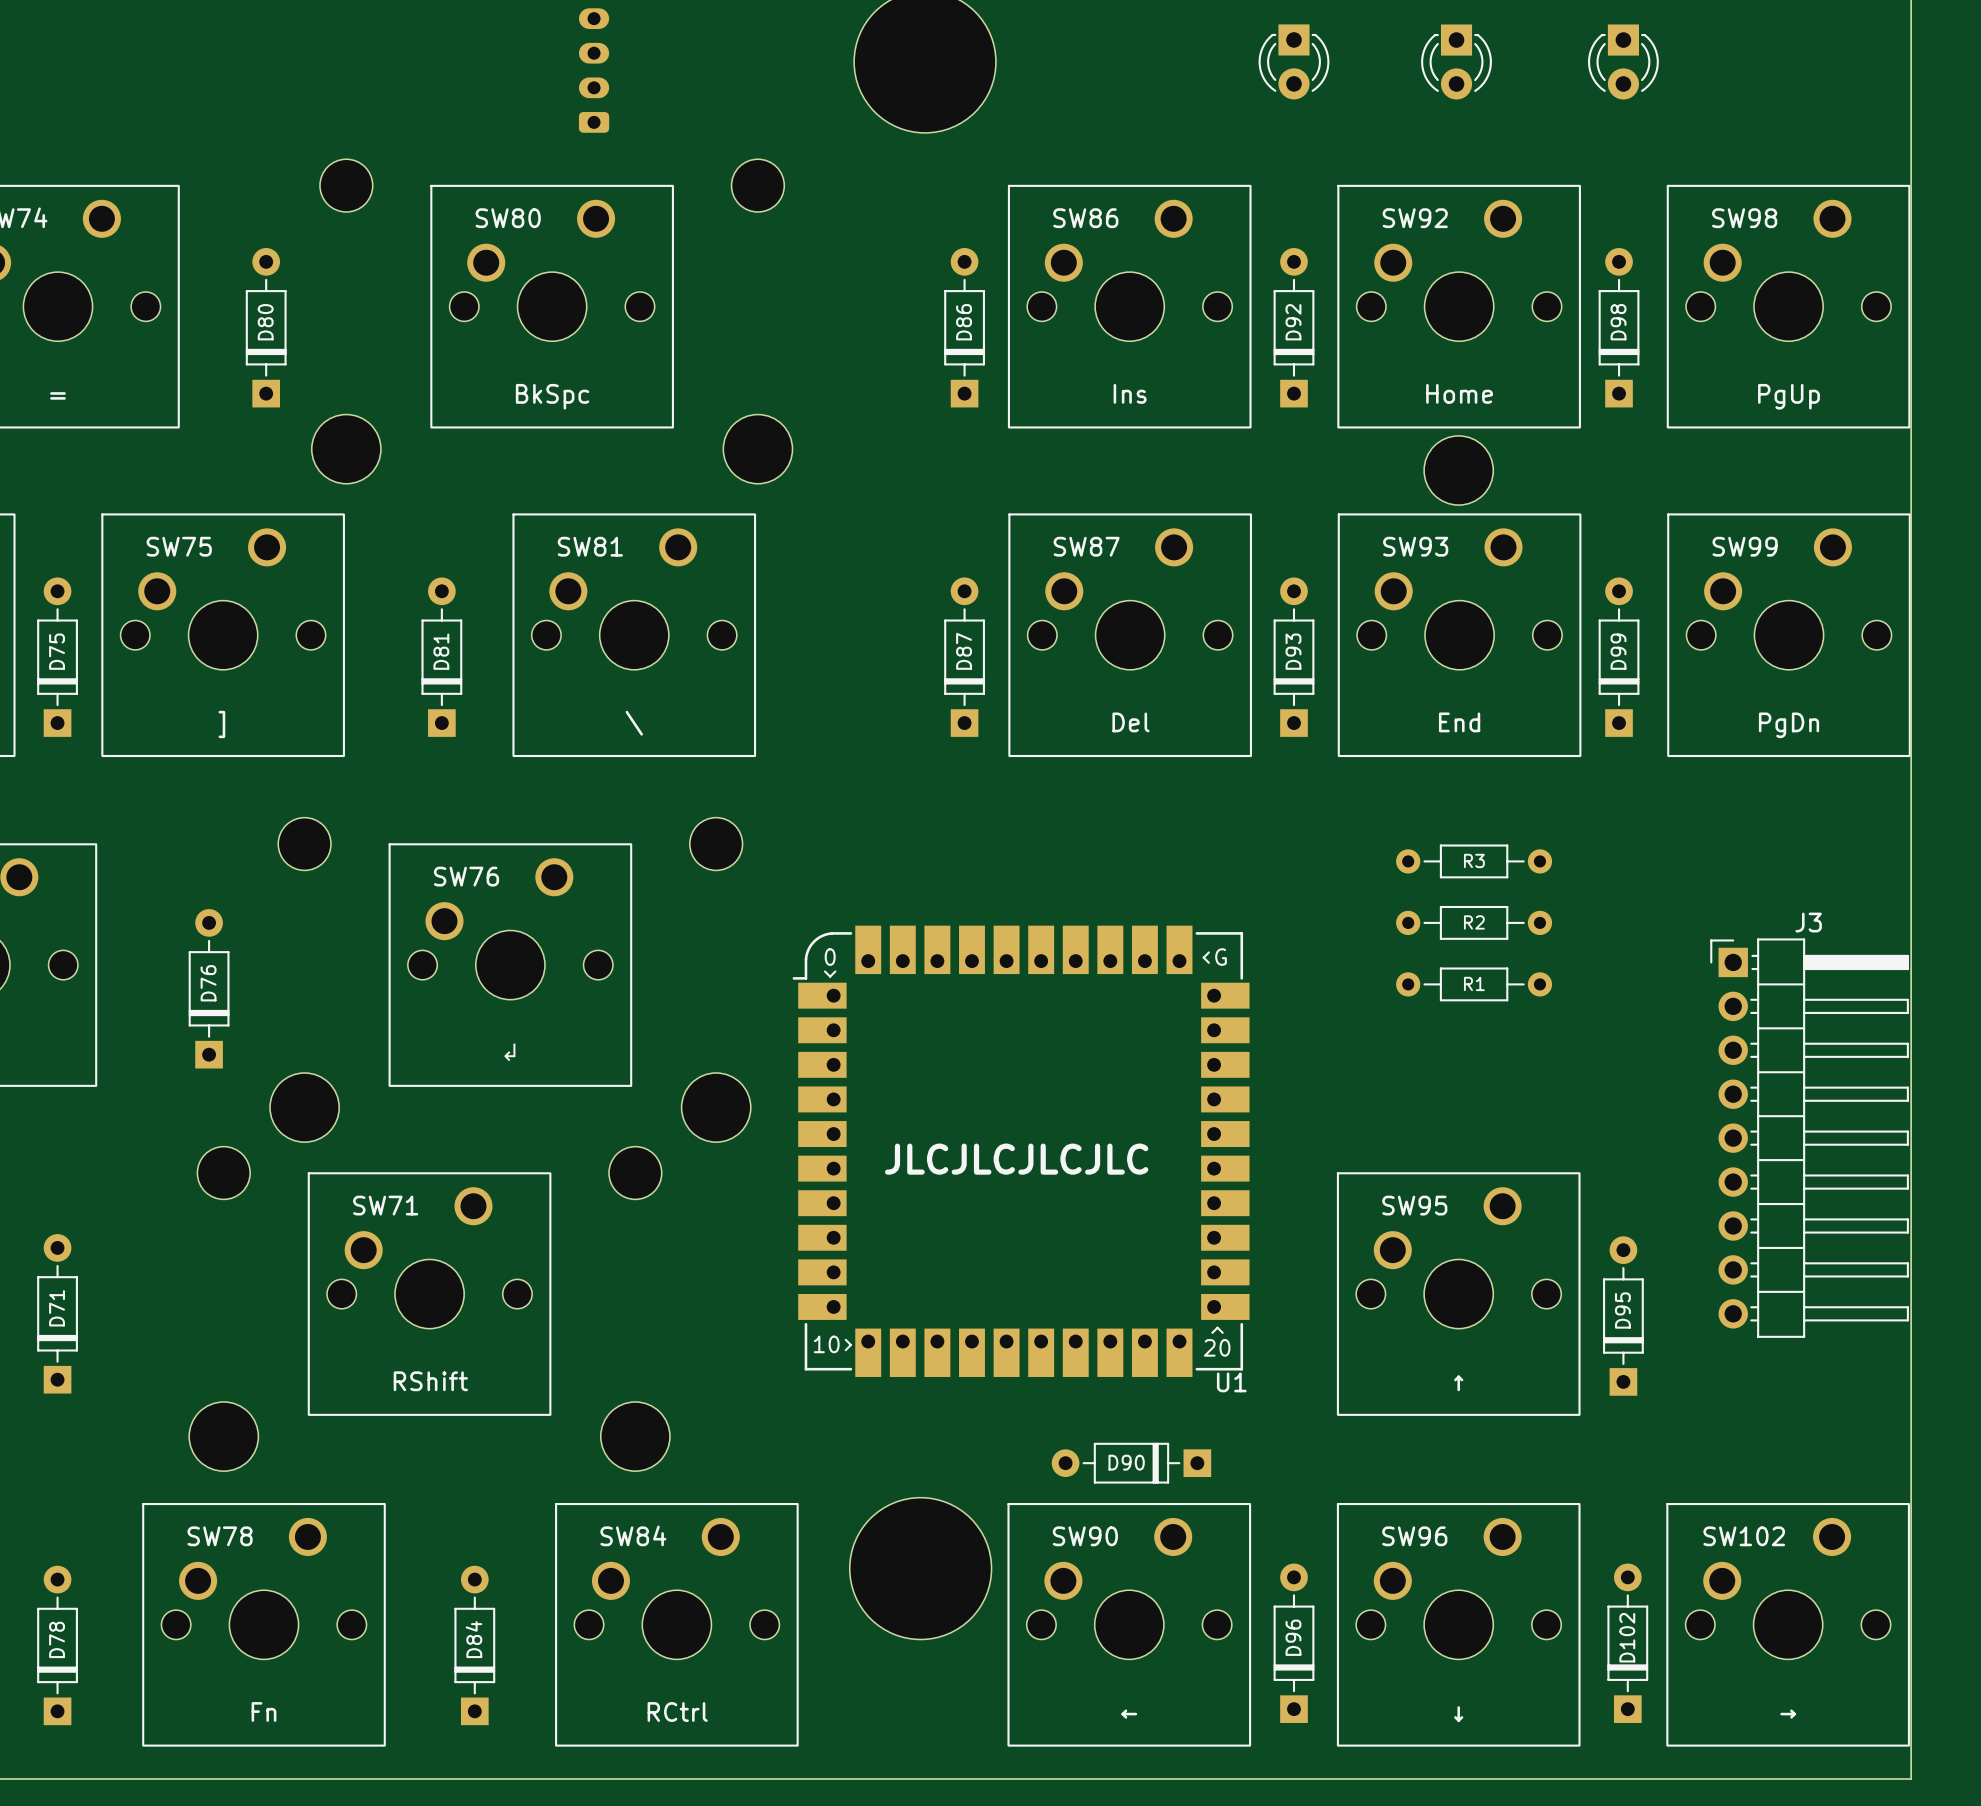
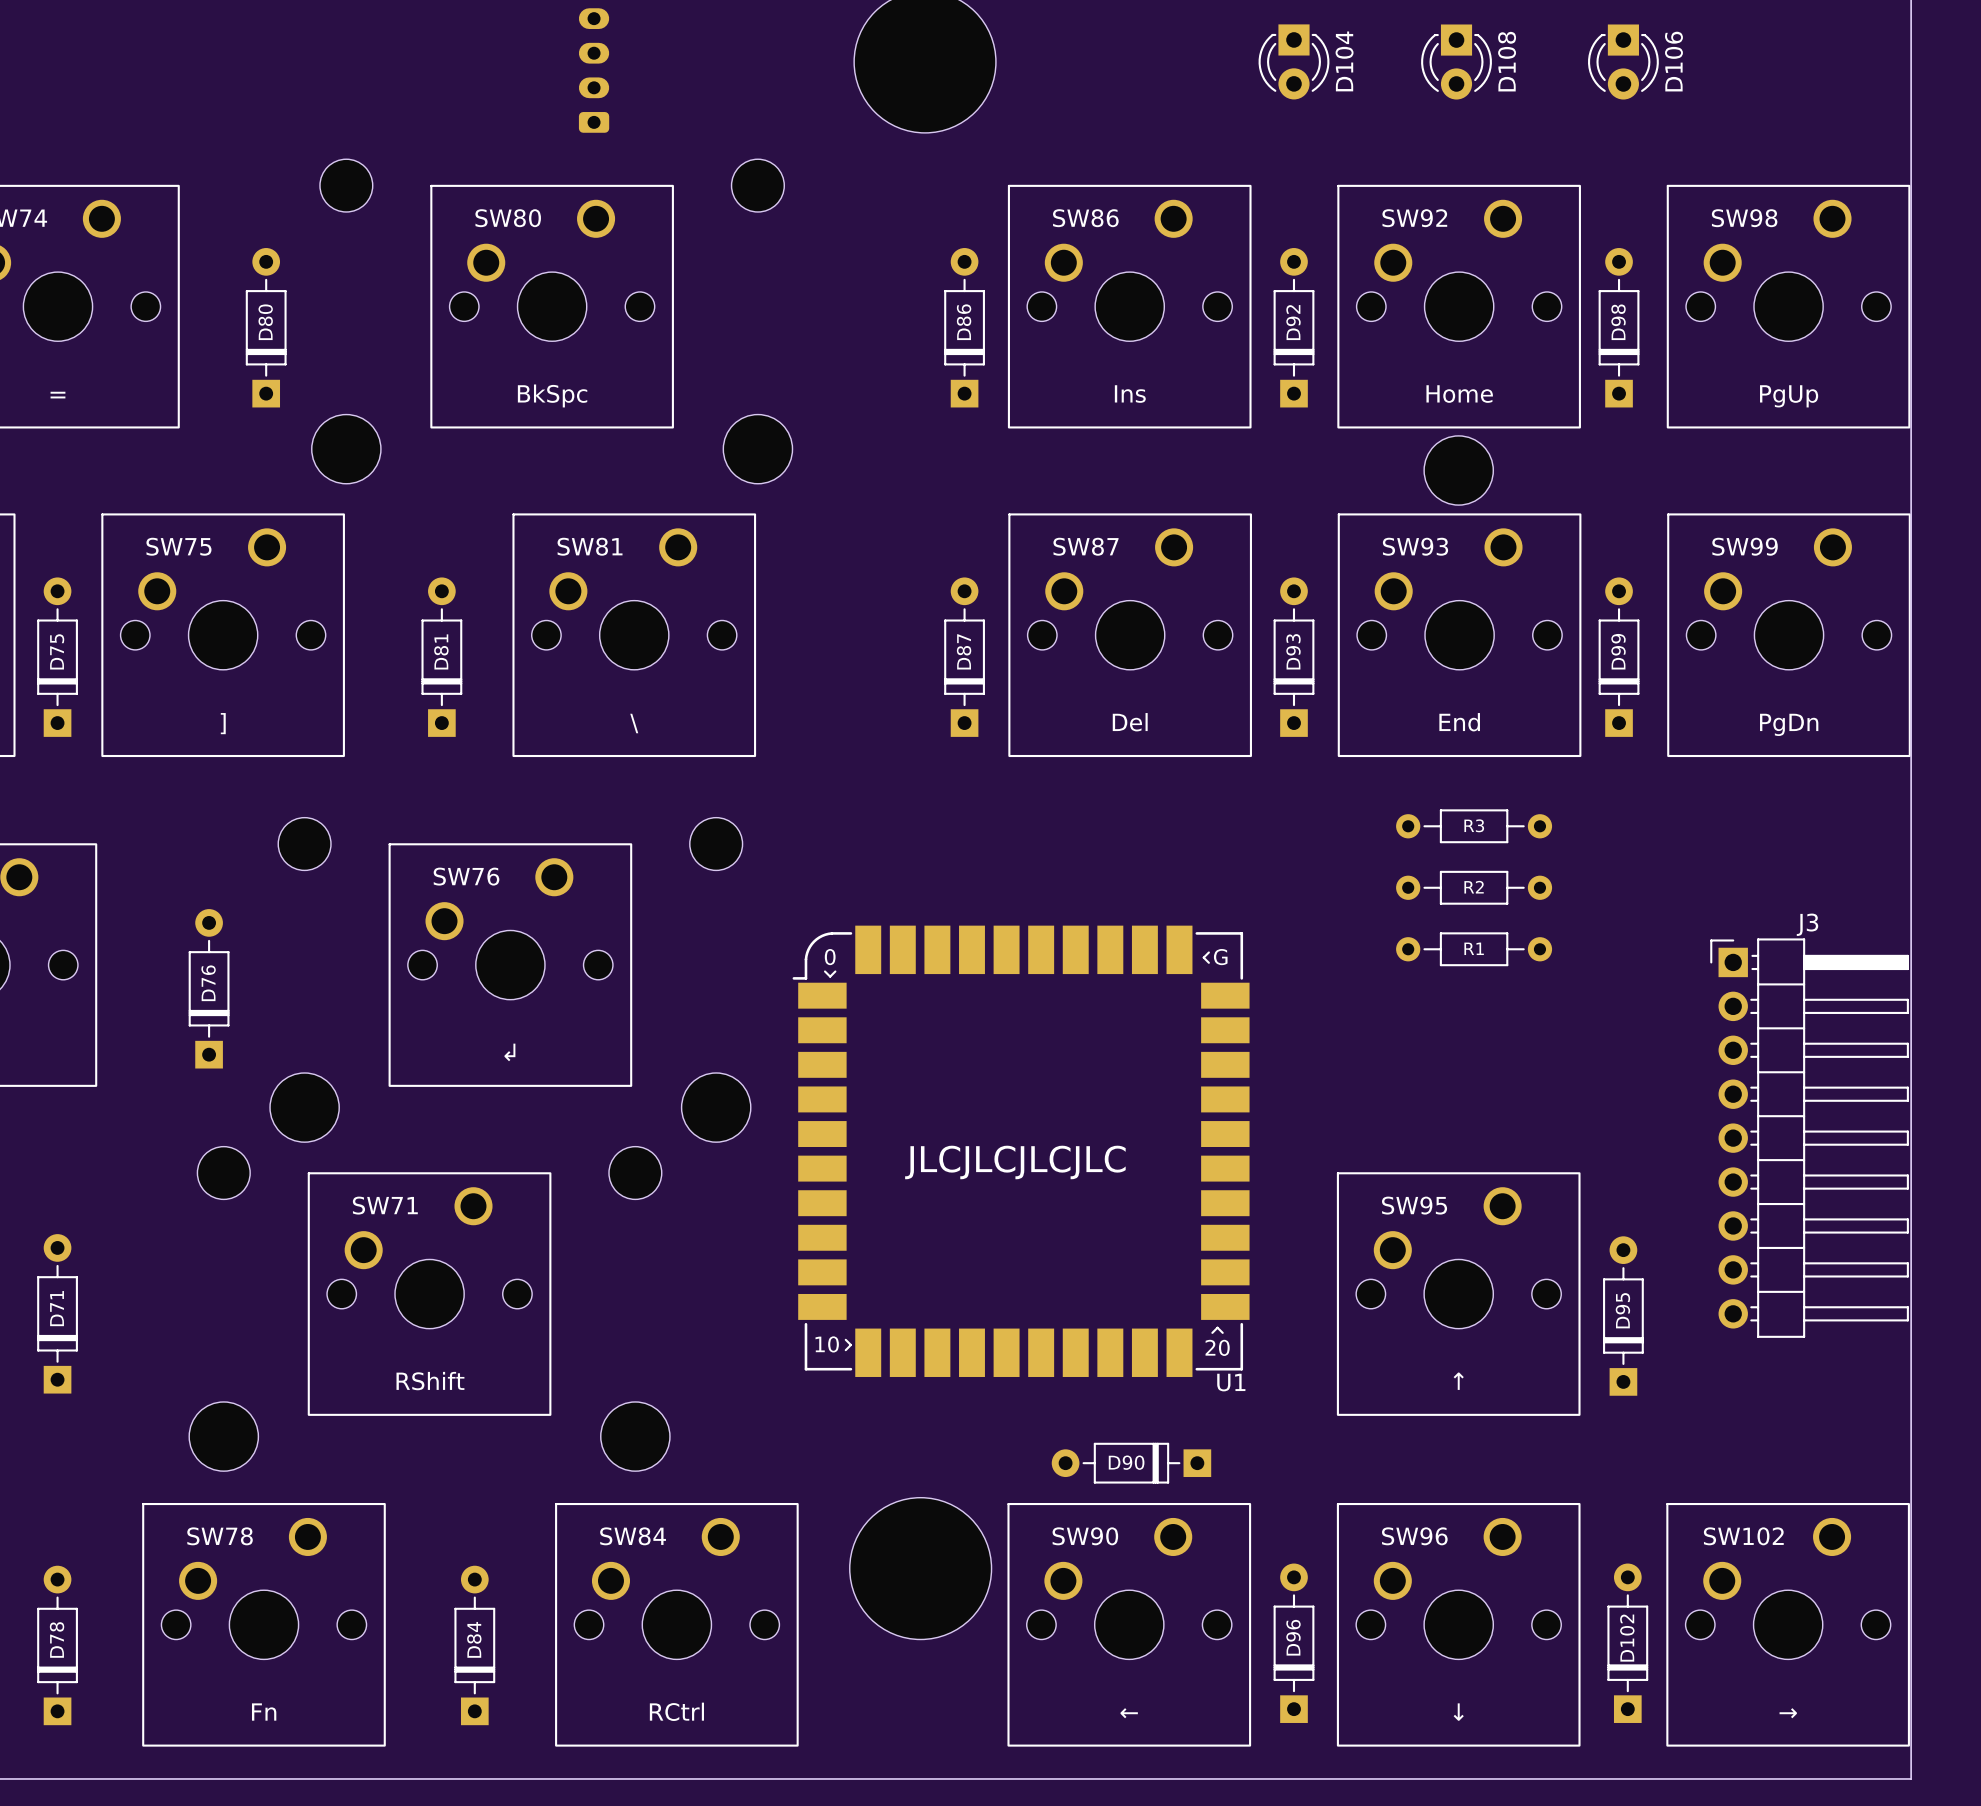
D104 name: none -> D104 (1344, 61)
D108 name: none -> D108 (1507, 61)
D106 name: none -> D106 (1673, 61)
R3 position: (1474, 861) -> (1474, 826)
R2 position: (1474, 922) -> (1474, 887)
U1 footprint: [792, 925, 1250, 1377] -> [792, 925, 1250, 1377]
R1 position: (1474, 984) -> (1474, 949)

